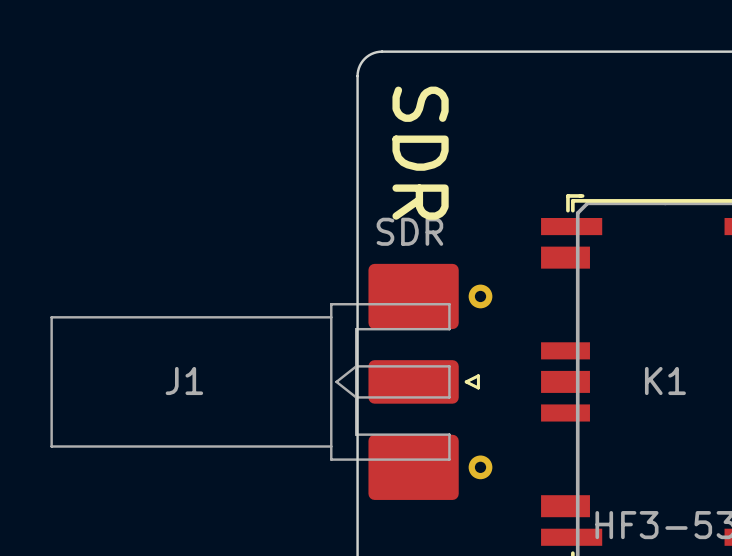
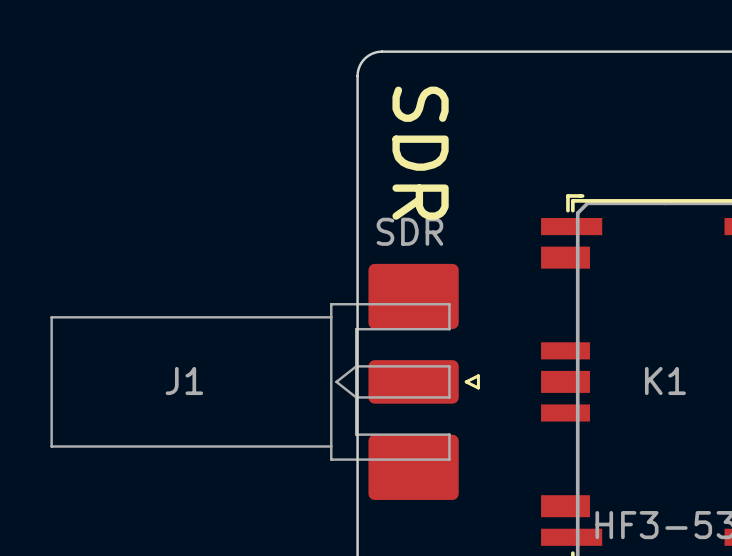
J1 footprint: [50, 263, 493, 500] -> [50, 263, 480, 500]

